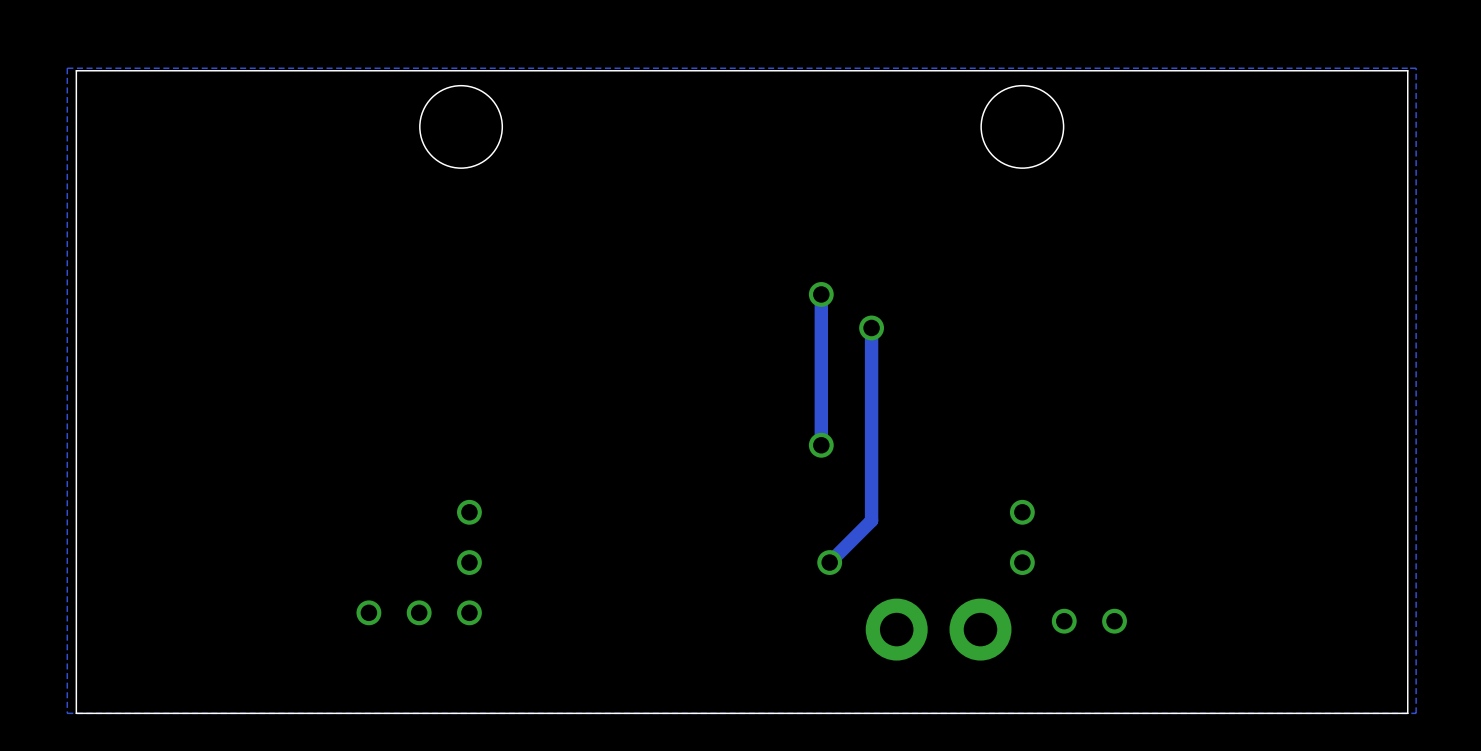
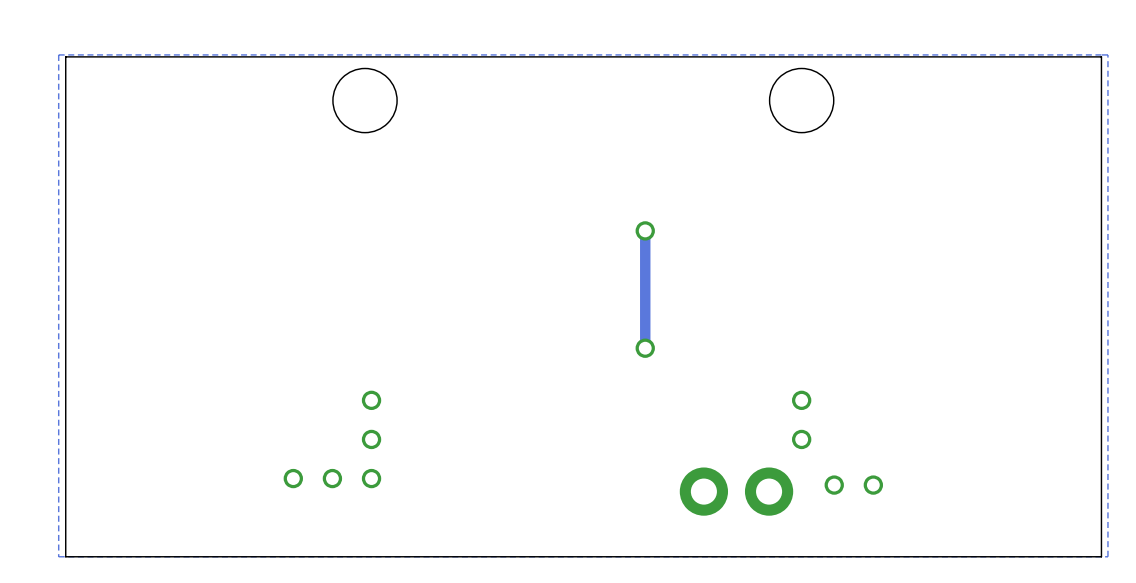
track: (871, 327) (871, 520) (829, 562) -> none
via: (871, 327) -> none
via: (829, 562) -> none

